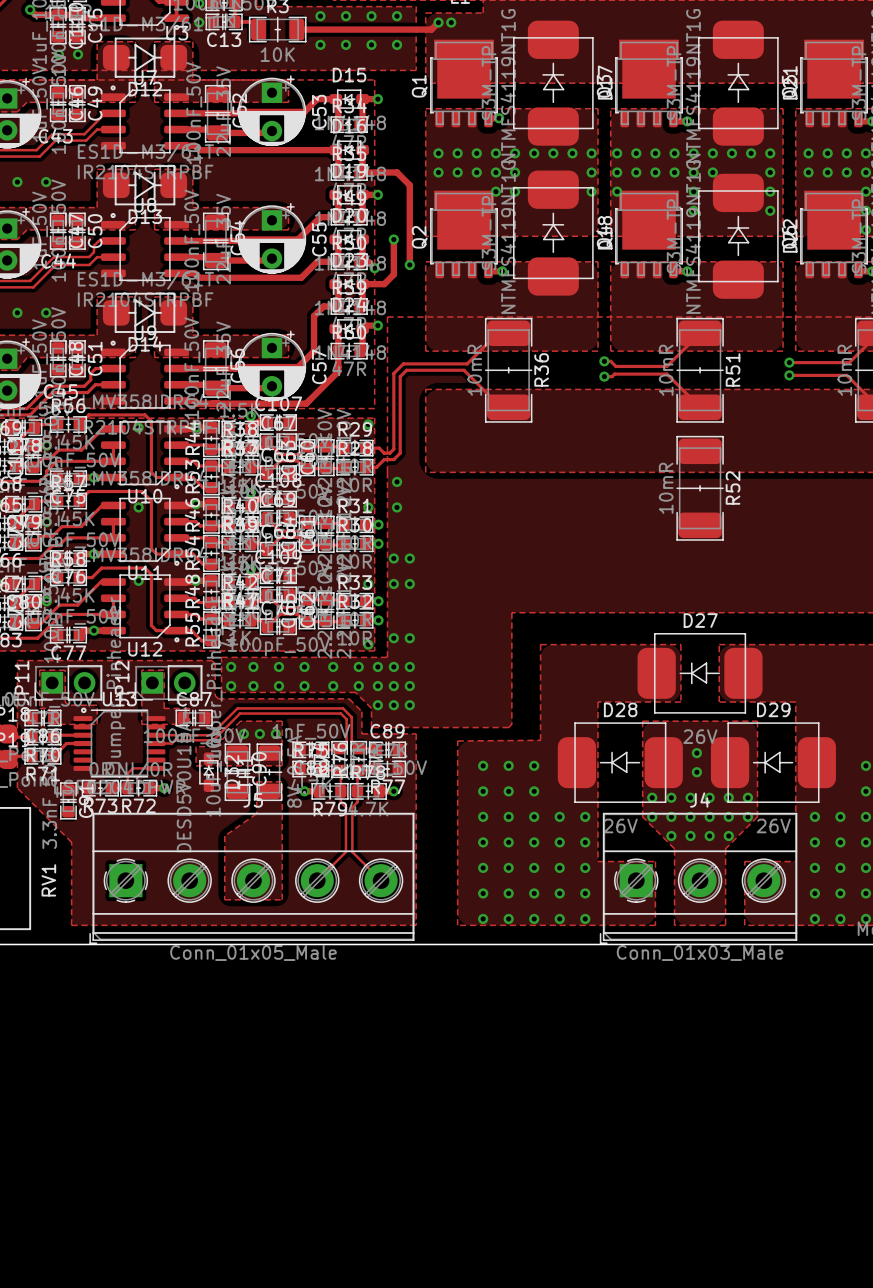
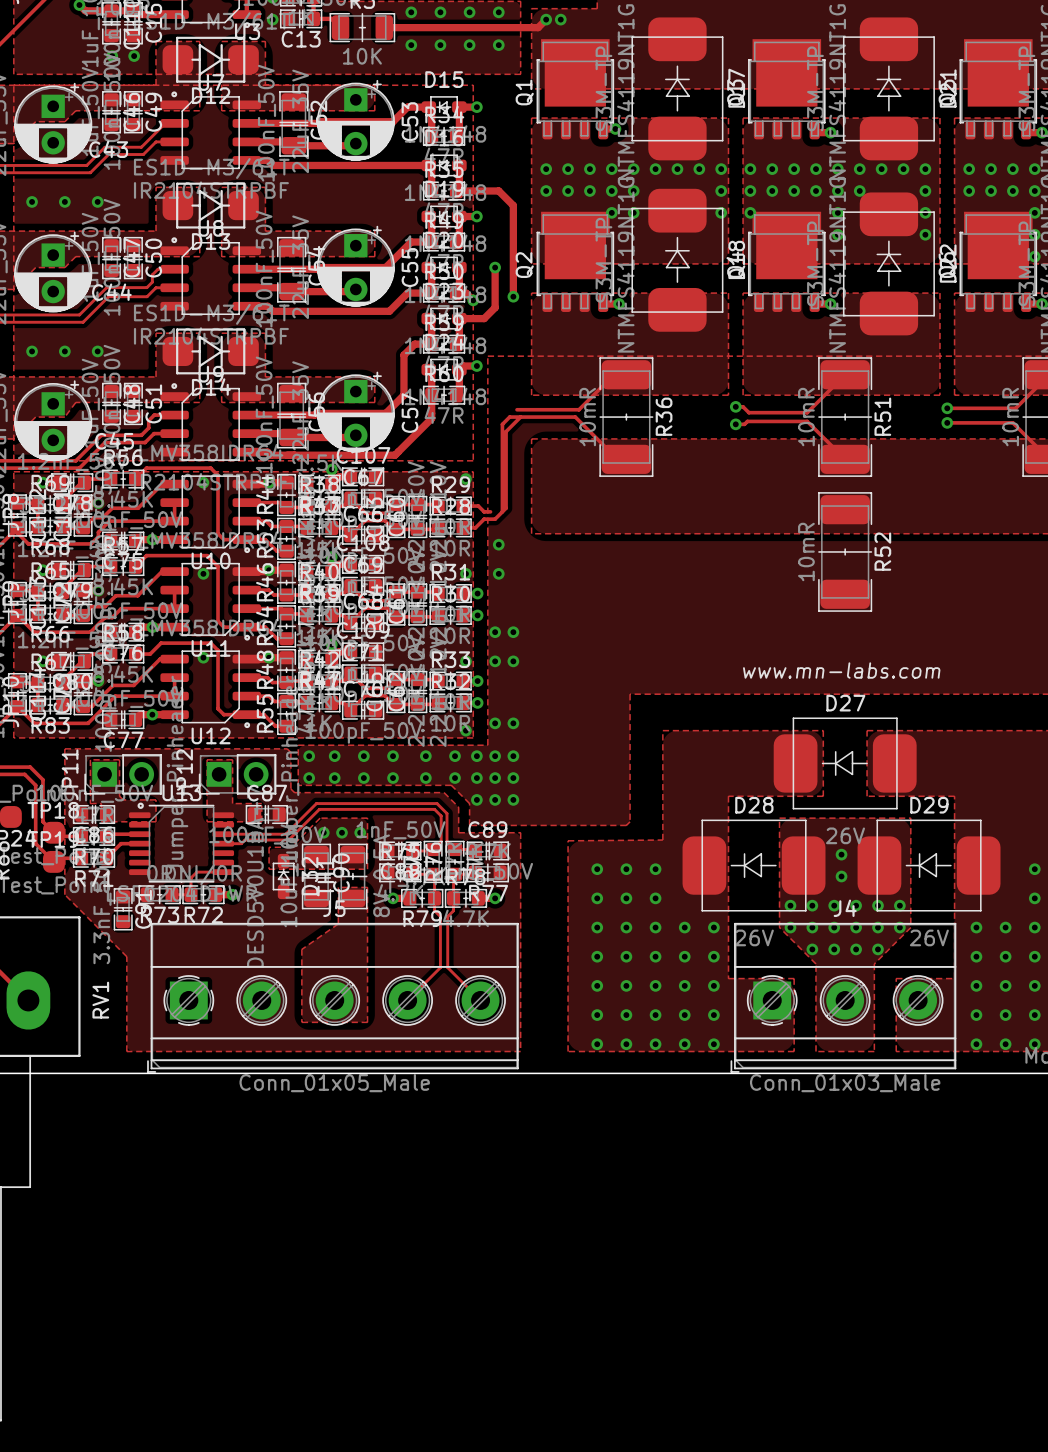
track: (412, 363) (403, 363) (393, 373) (393, 449) (389, 453) -> none
track: none -> (520, 417) (506, 431) (506, 508) (502, 511)
text: none -> www.mn-labs.com (841, 670)

